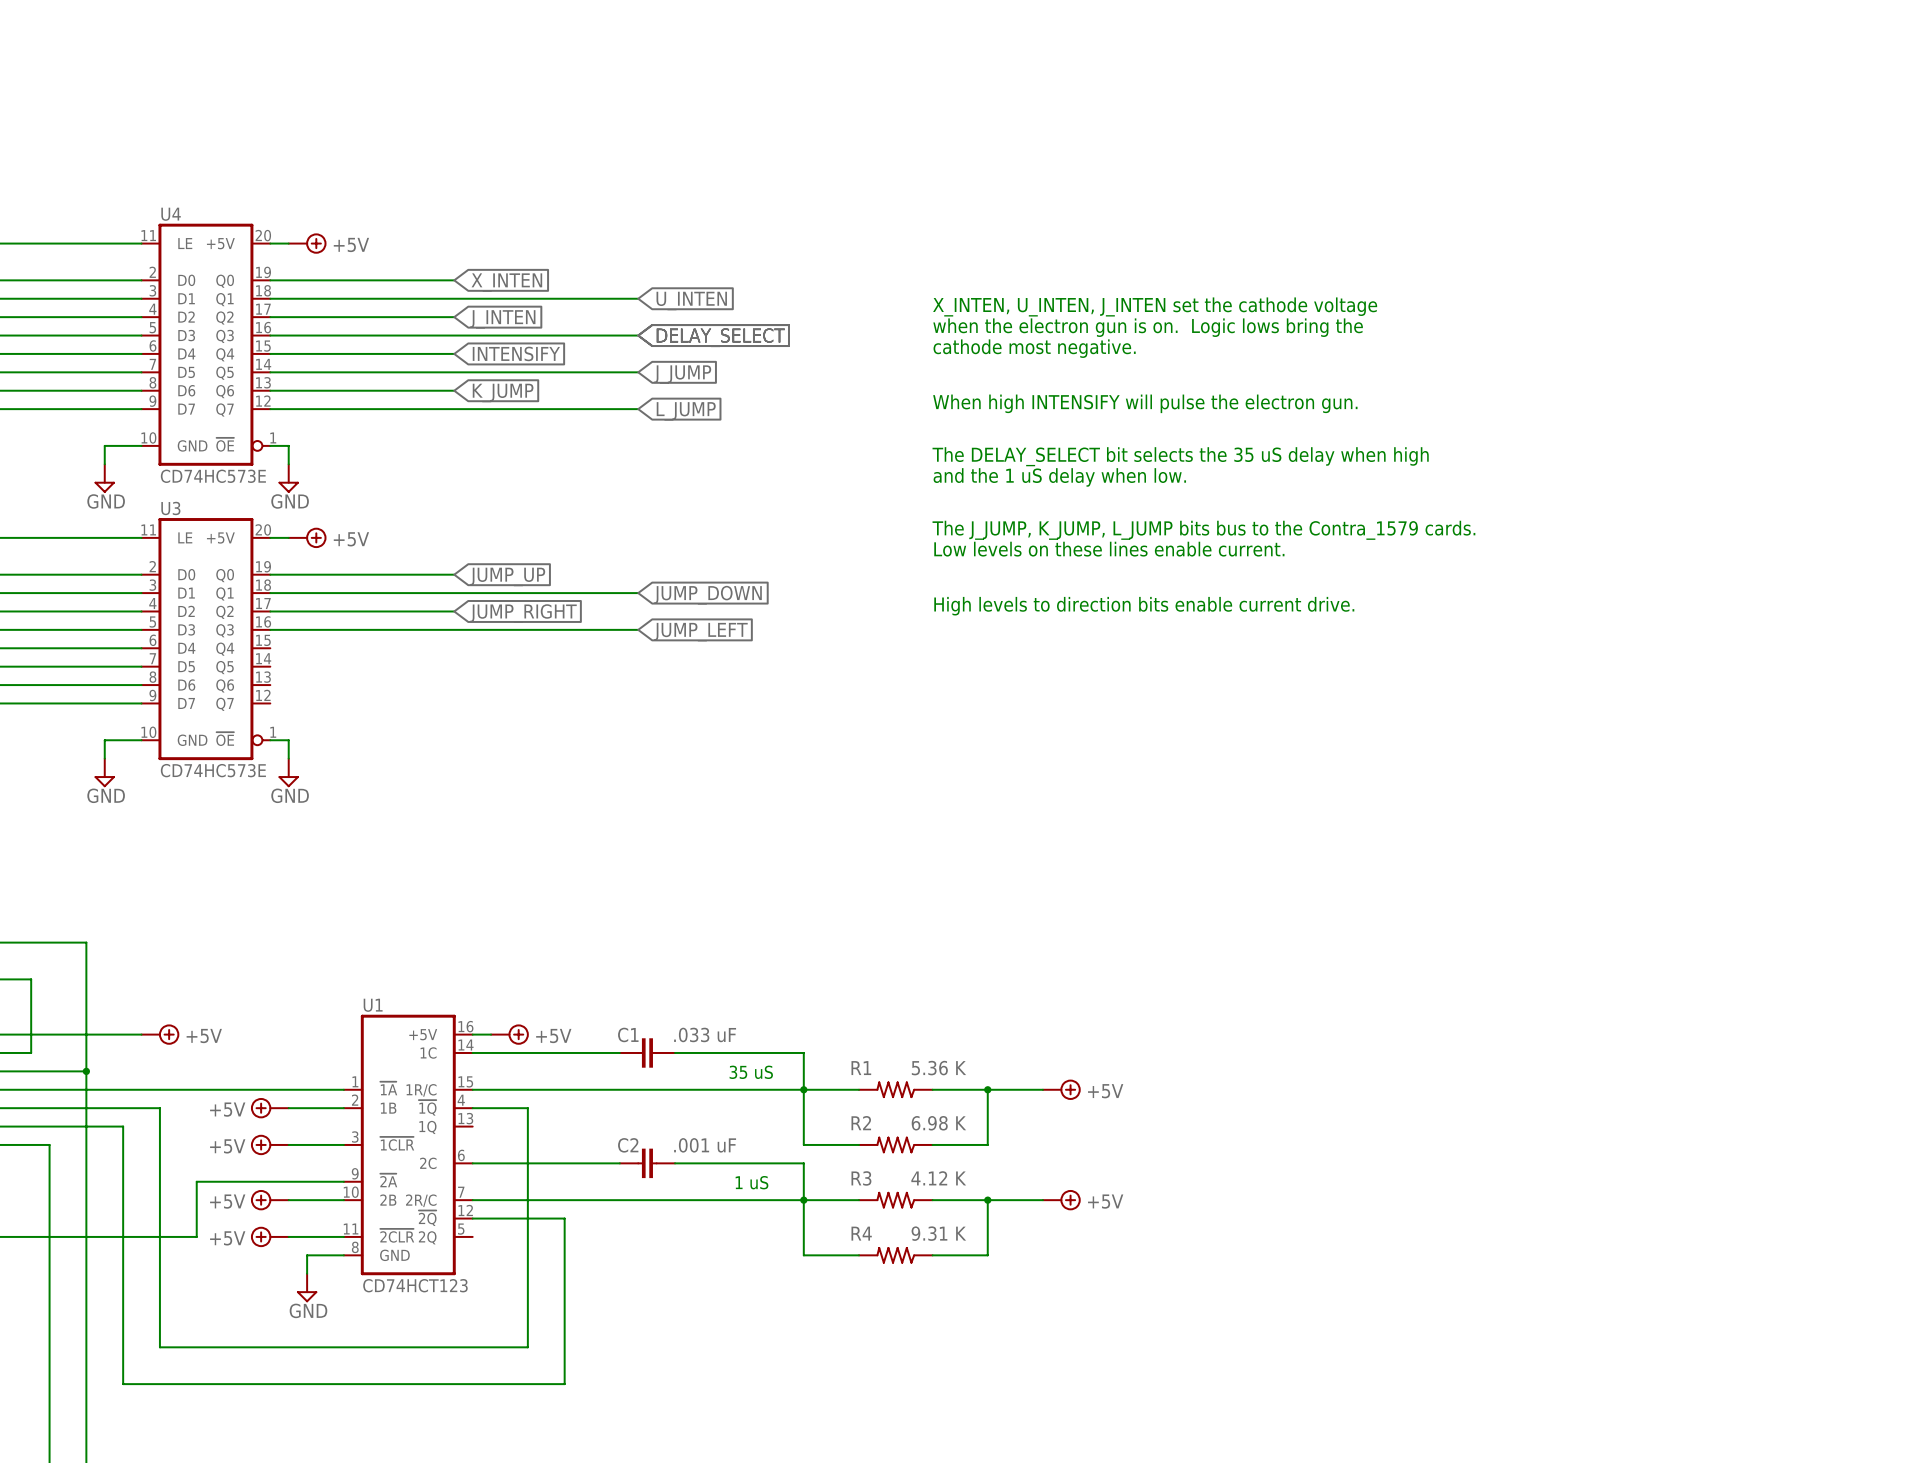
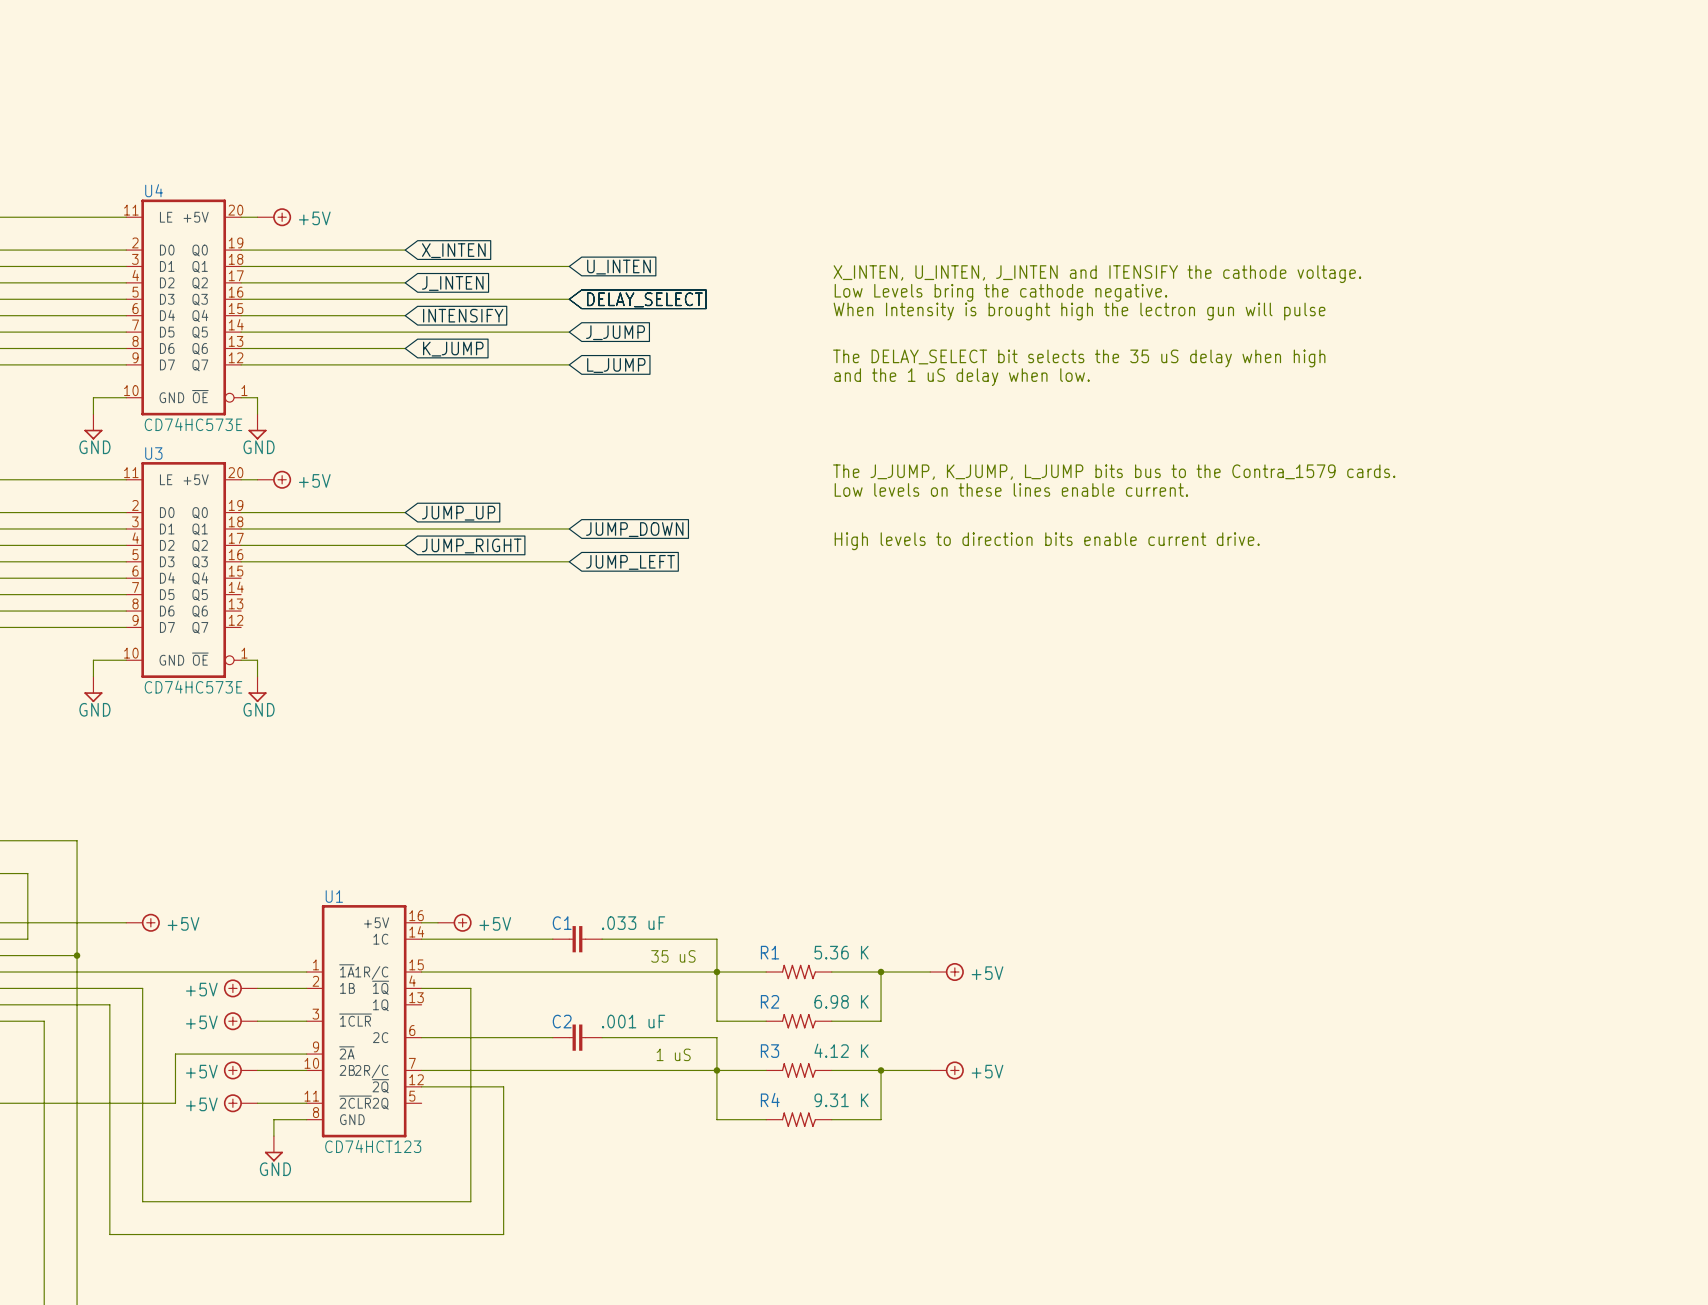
text: X_INTEN, U_INTEN, J_INTEN set the cathode voltage (1155, 306) -> X_INTEN, U_INTEN, J_INTEN and ITENSIFY the cathode voltage. (1097, 274)
text: when the electron gun is on. Logic lows bring the (1148, 327) -> Low Levels bring the cathode negative. (1000, 292)
text: cathode most negative. (1034, 348) -> When Intensity is brought high the lectron gun will pulse (1079, 311)
text: When high INTENSIFY will pulse the electron gun. (1145, 403) -> The DELAY_SELECT bit selects the 35 uS delay when high (1079, 358)
text: The DELAY_SELECT bit selects the 35 uS delay when high (1180, 456) -> none
text position: and the 1 uS delay when low. (1059, 477) -> and the 1 uS delay when low. (961, 377)

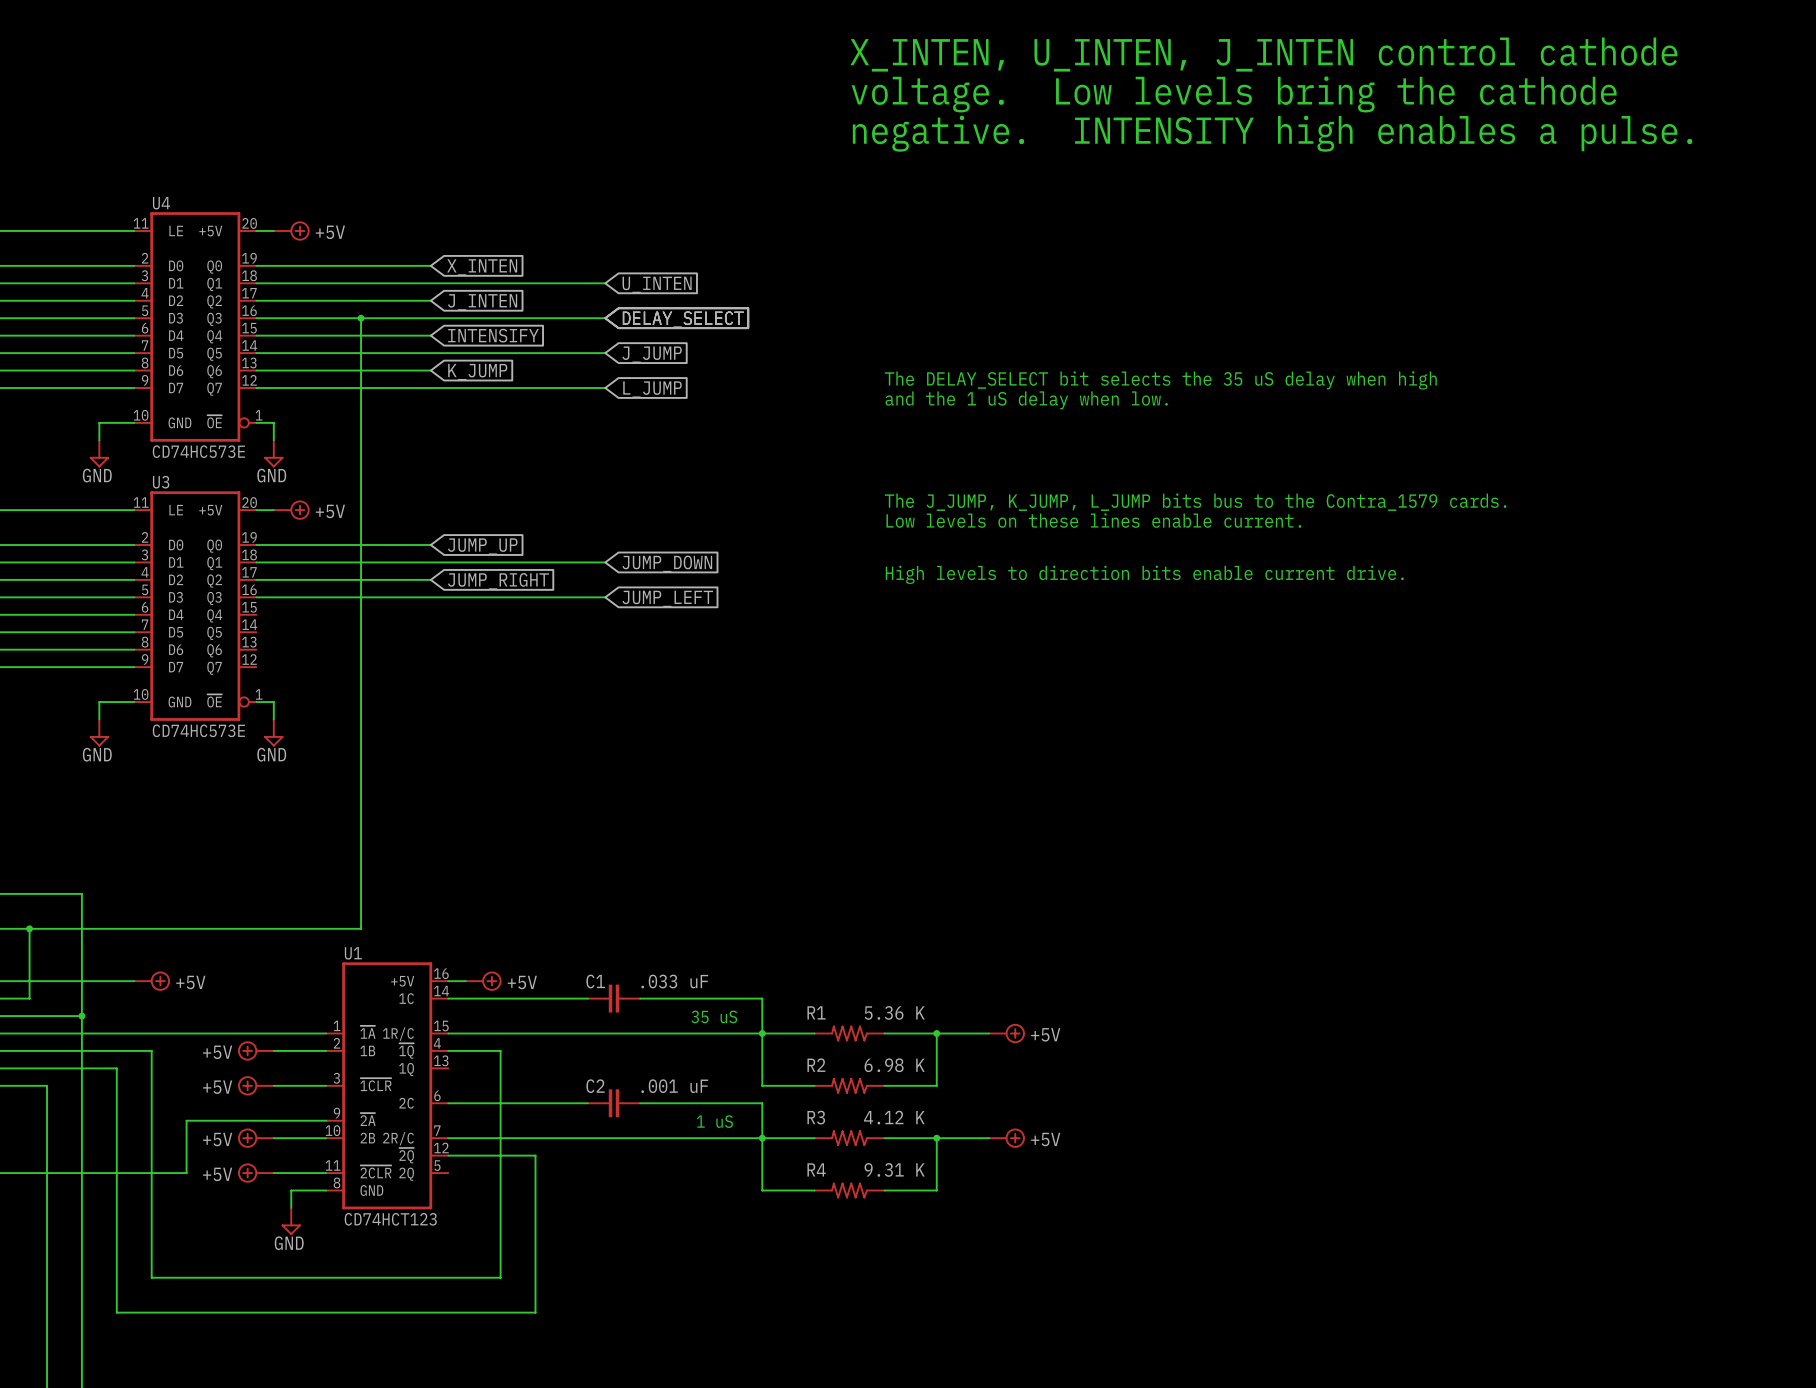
text: none -> X_INTEN, U_INTEN, J_INTEN control cathode (1263, 54)
text: none -> voltage. Low levels bring the cathode (1234, 94)
text: none -> negative. INTENSITY high enables a pulse. (1272, 133)
text: X_INTEN, U_INTEN, J_INTEN and ITENSIFY the cathode voltage. (1097, 274) -> none
text: Low Levels bring the cathode negative. (1000, 292) -> none
wire: none -> (361, 318) (361, 928) (29, 928)
junction: none -> (361, 318)
text: When Intensity is brought high the lectron gun will pulse (1079, 311) -> none
junction: none -> (29, 928)

